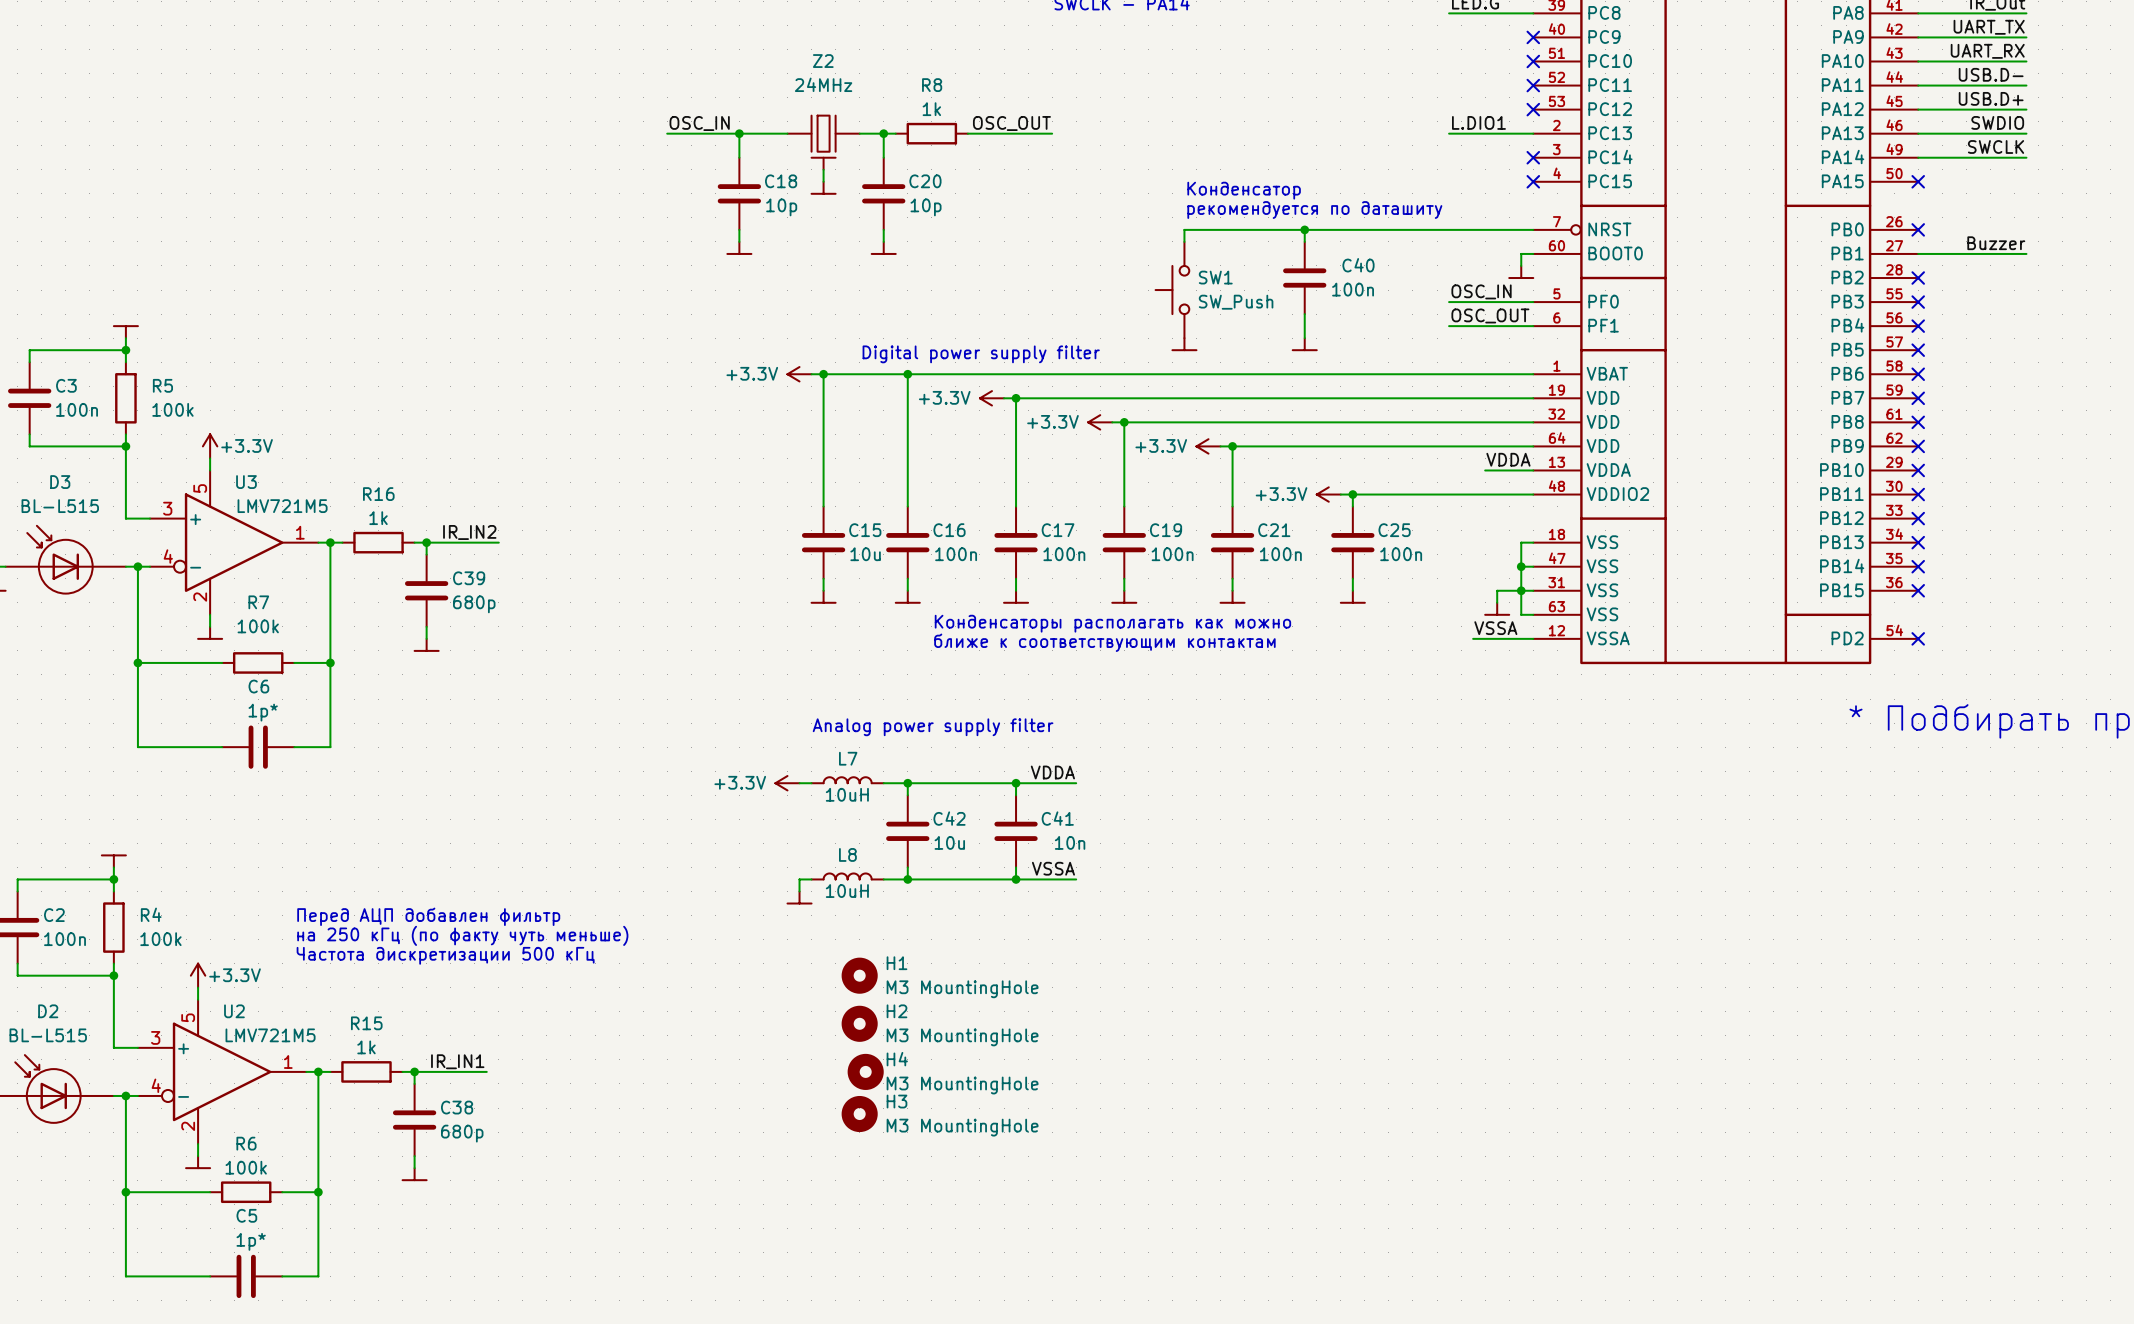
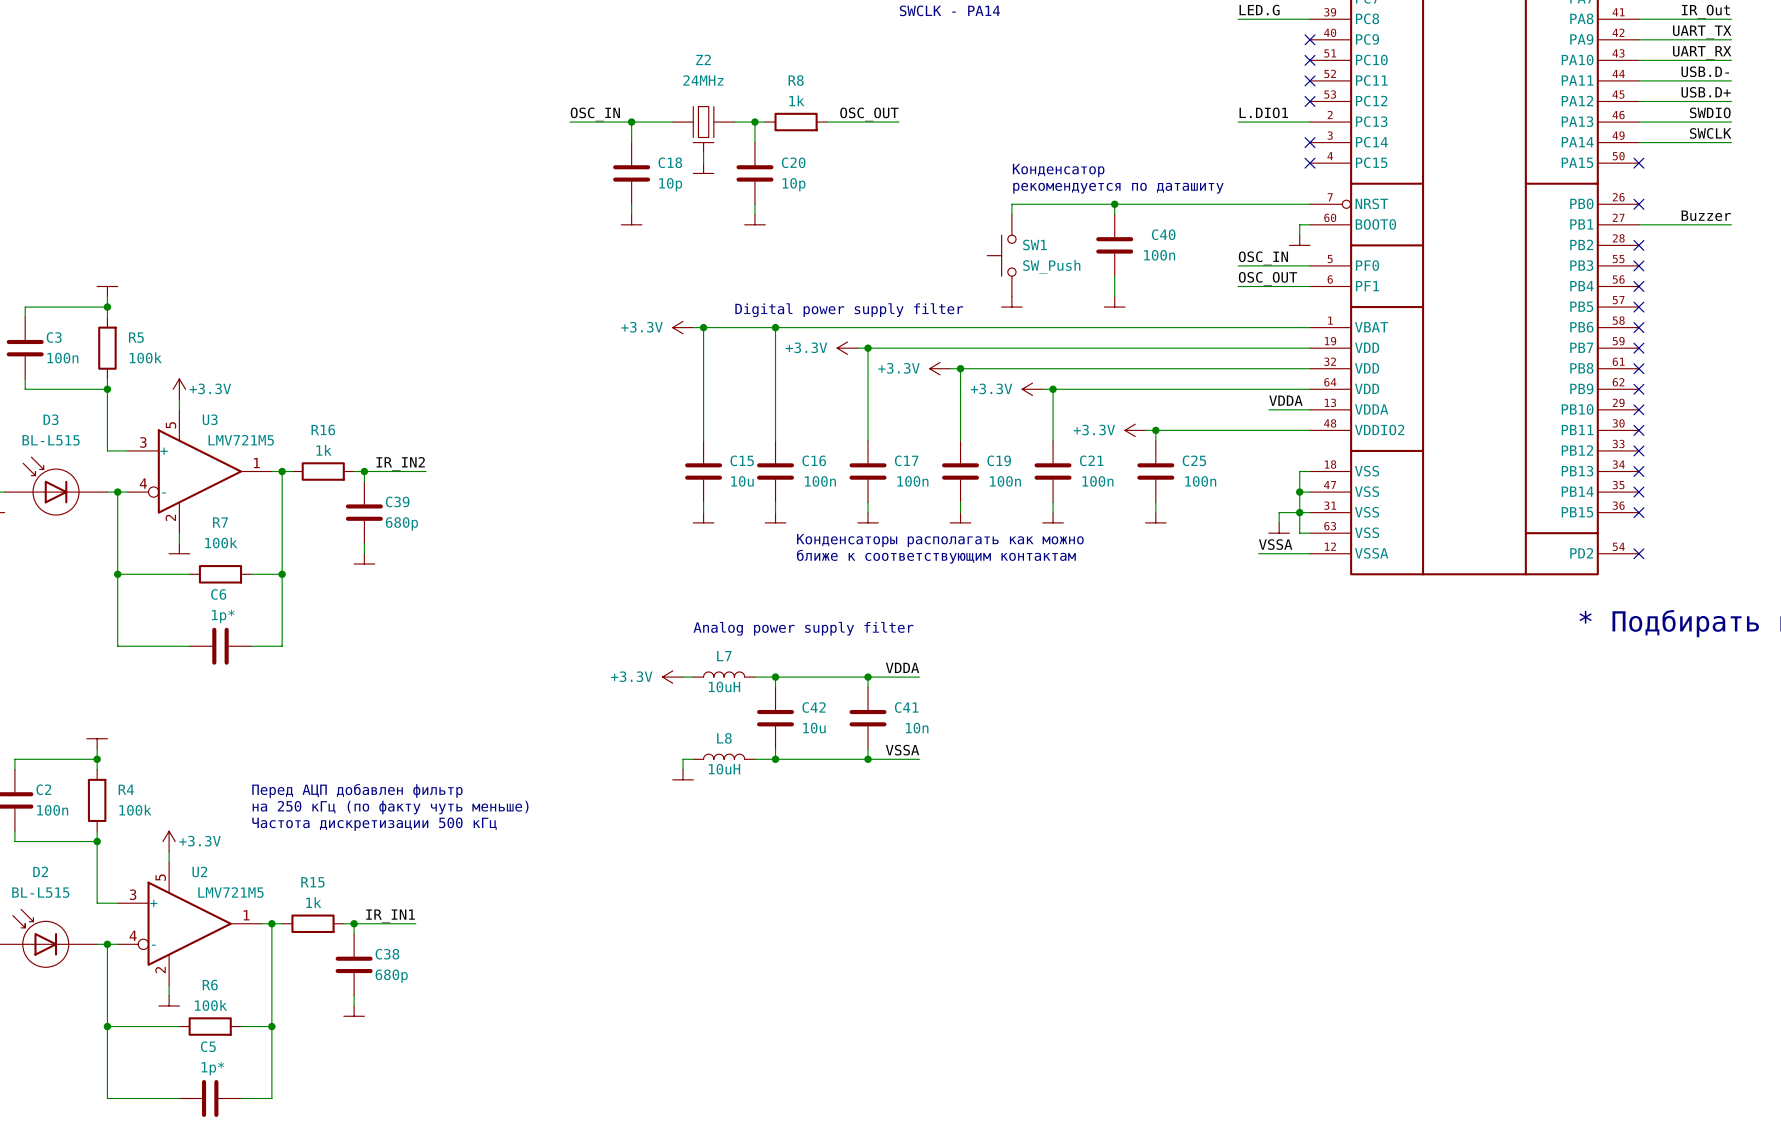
H1: M3 MountingHole (859, 975) -> none
H2: M3 MountingHole (859, 1023) -> none
H4: M3 MountingHole (865, 1071) -> none
H3: M3 MountingHole (859, 1114) -> none

